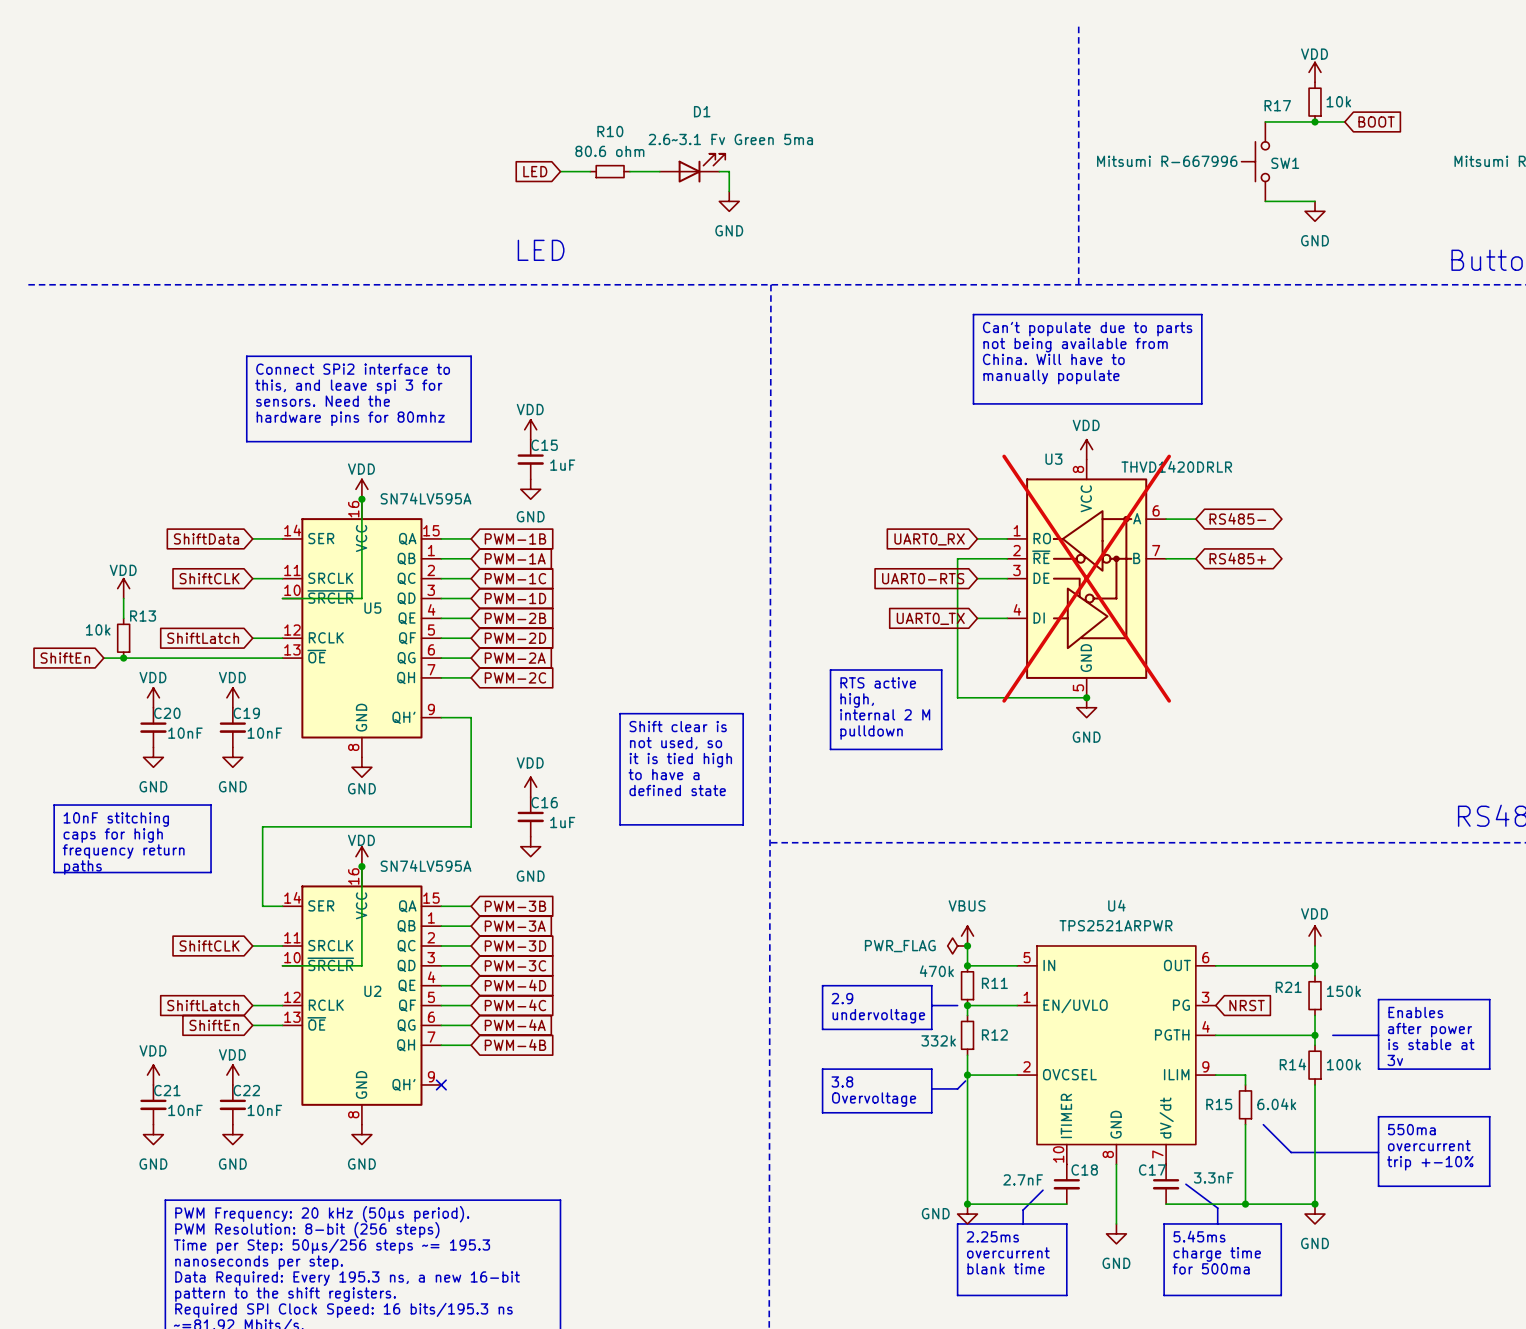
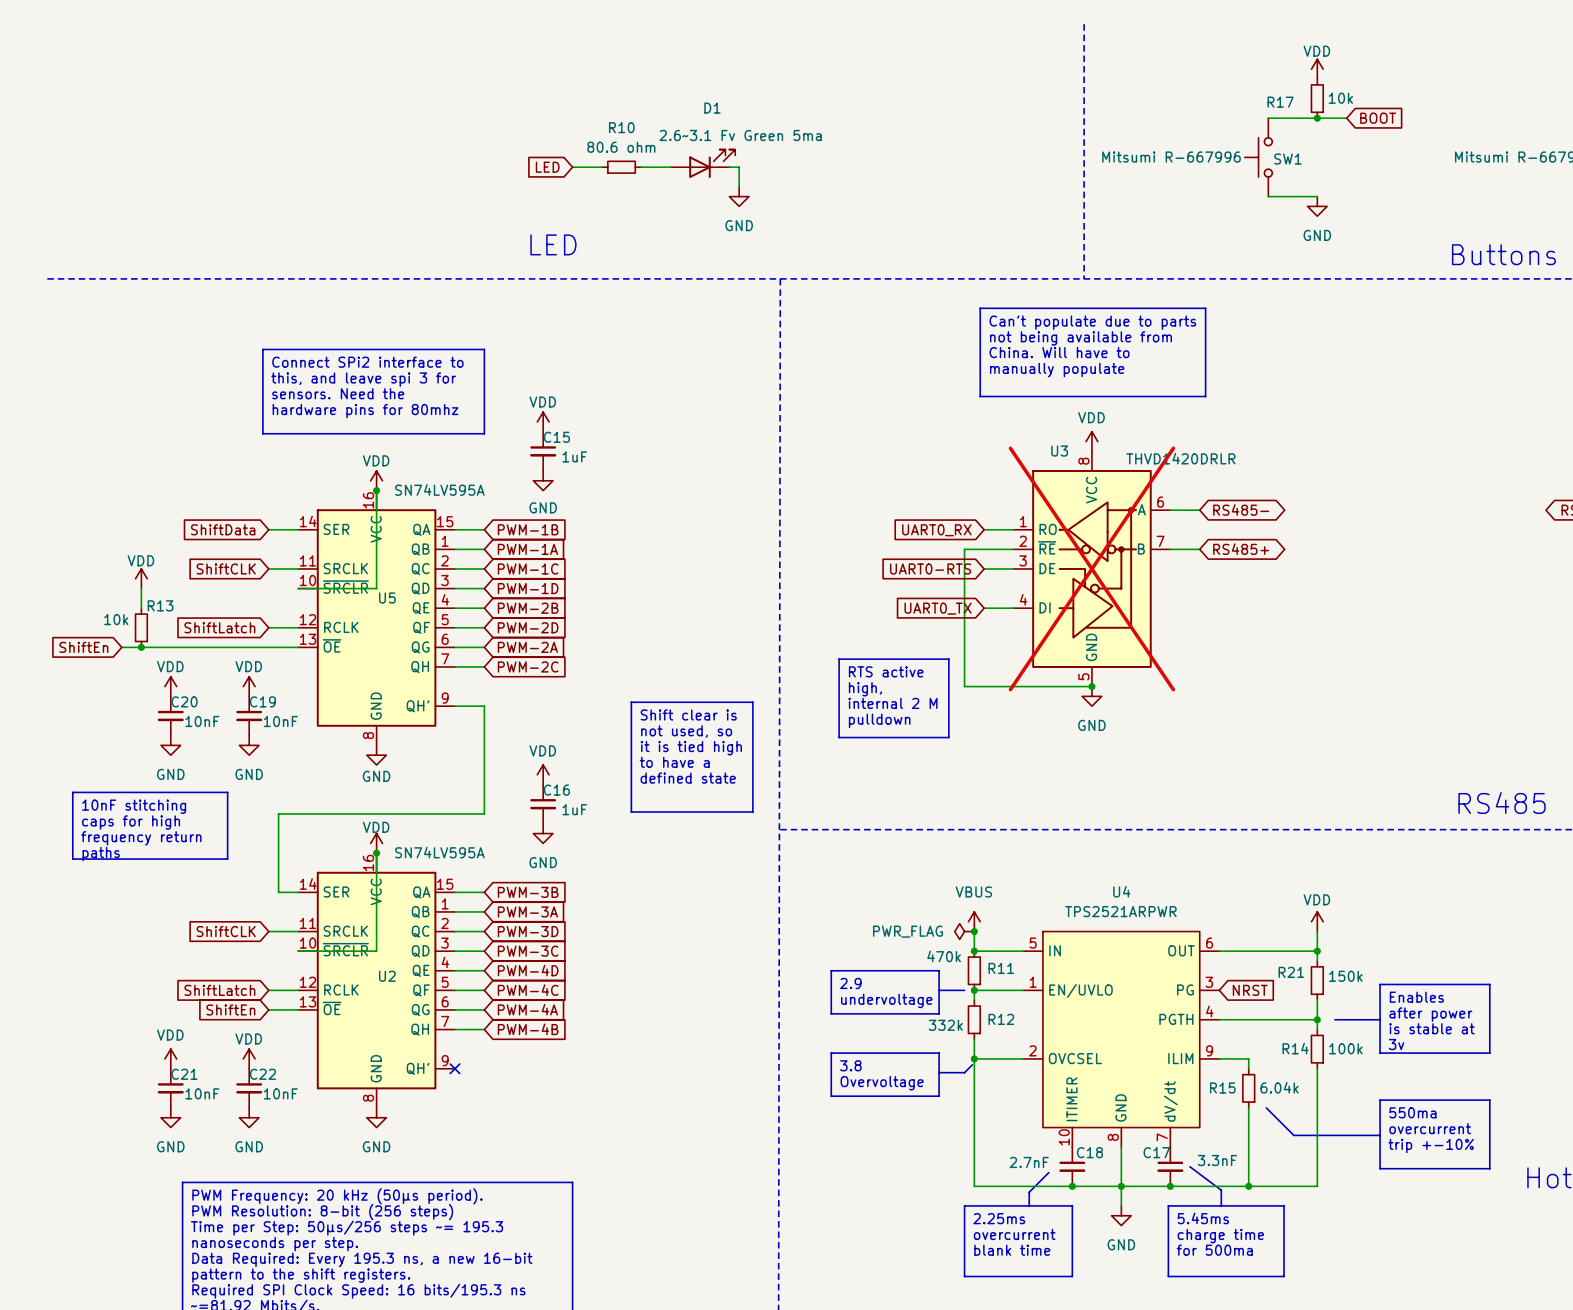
junction: (967, 1204) -> none
wire: none -> (1072, 1186) (1170, 1186)
junction: none -> (1072, 1186)
junction: none -> (1121, 1186)
junction: none -> (1170, 1186)
junction: (1315, 1204) -> none
power symbol: GND (967, 1214) -> none
power symbol: GND (1315, 1214) -> none

